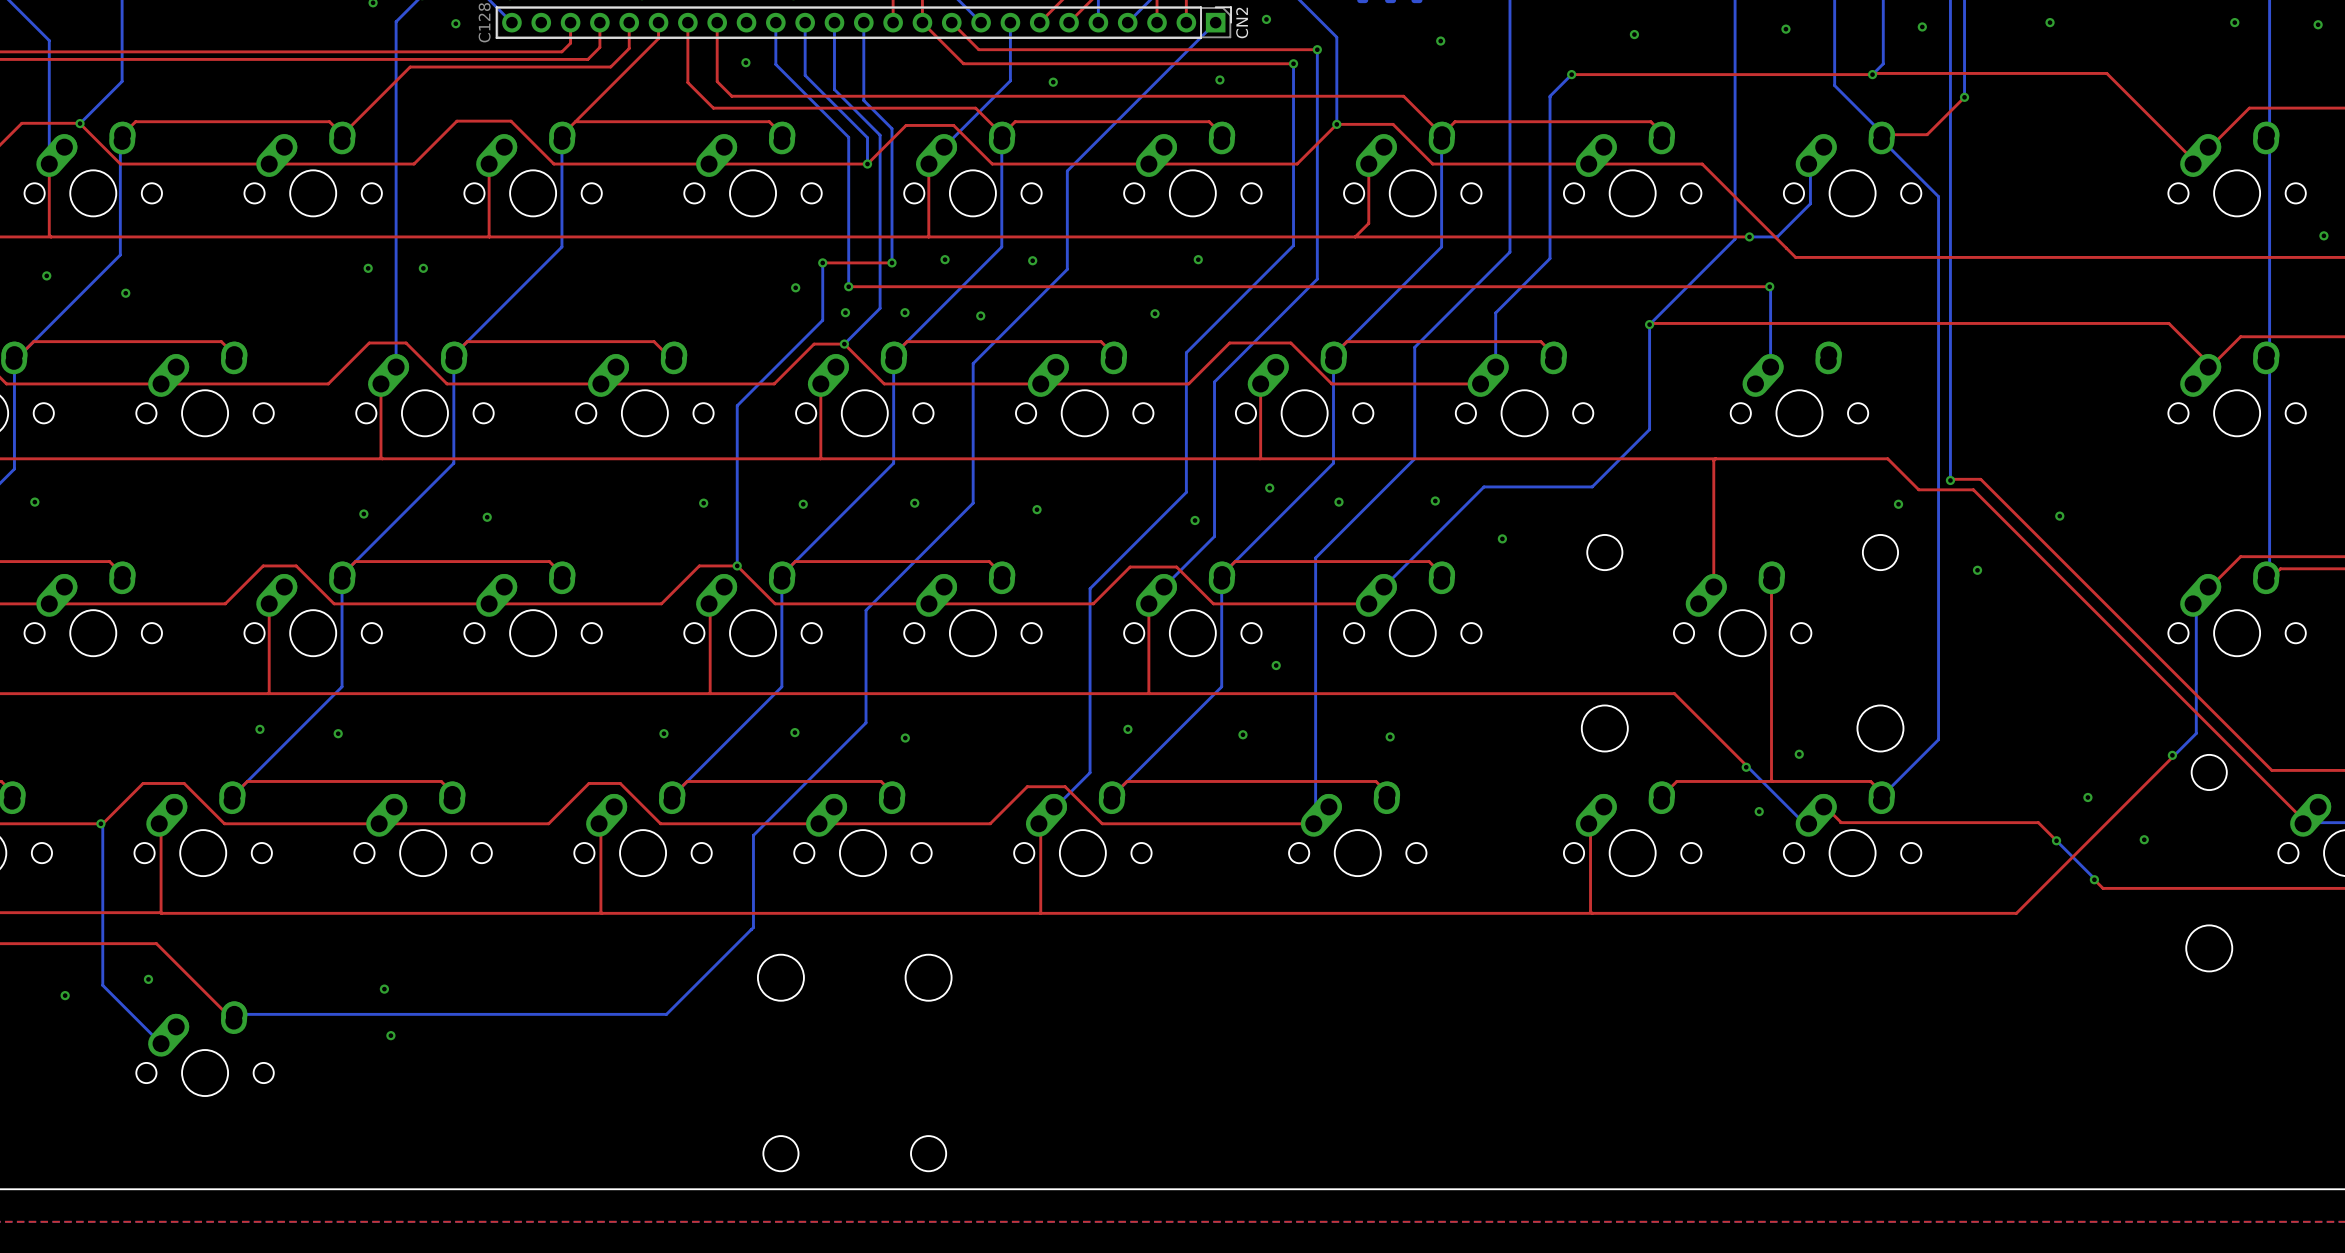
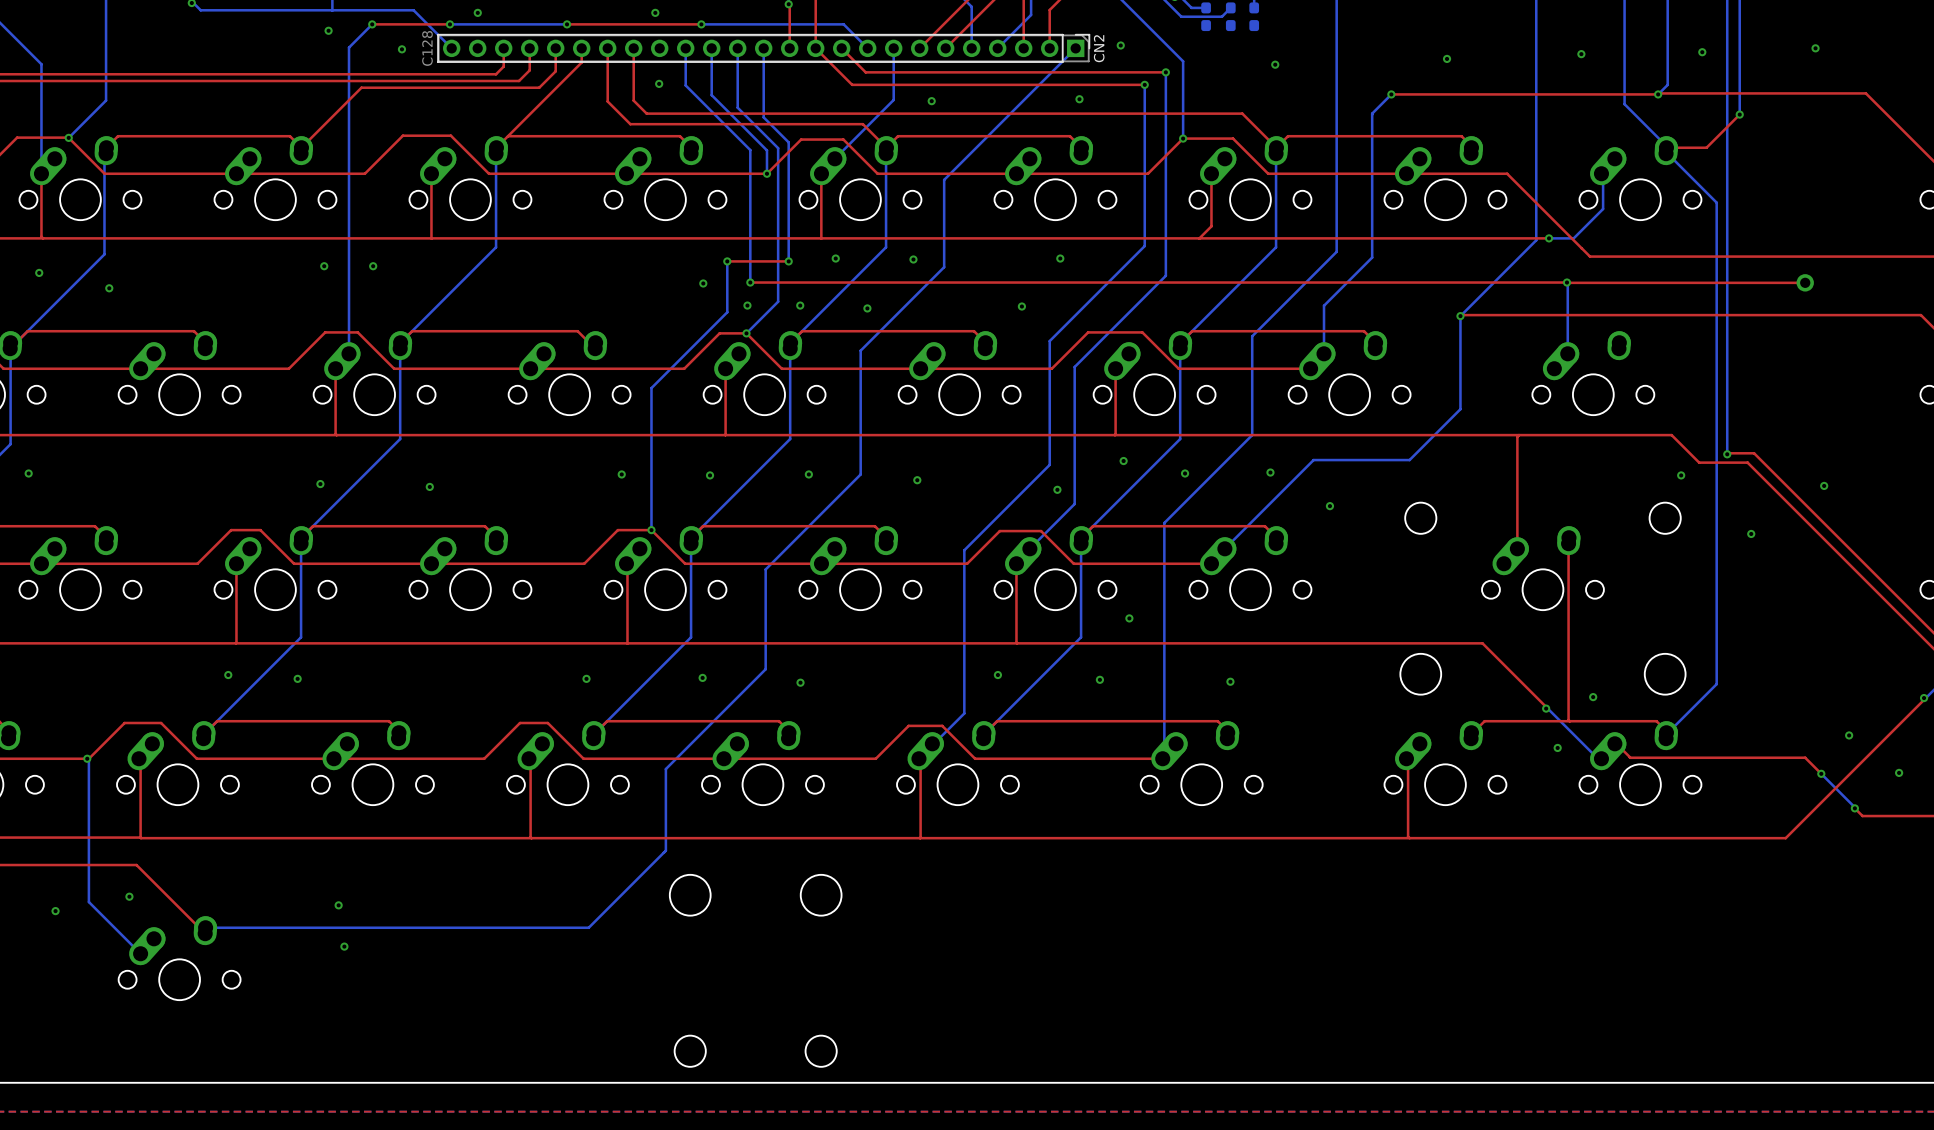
top track: none -> (1566, 282) (1805, 282)
part: none -> (1805, 282)

